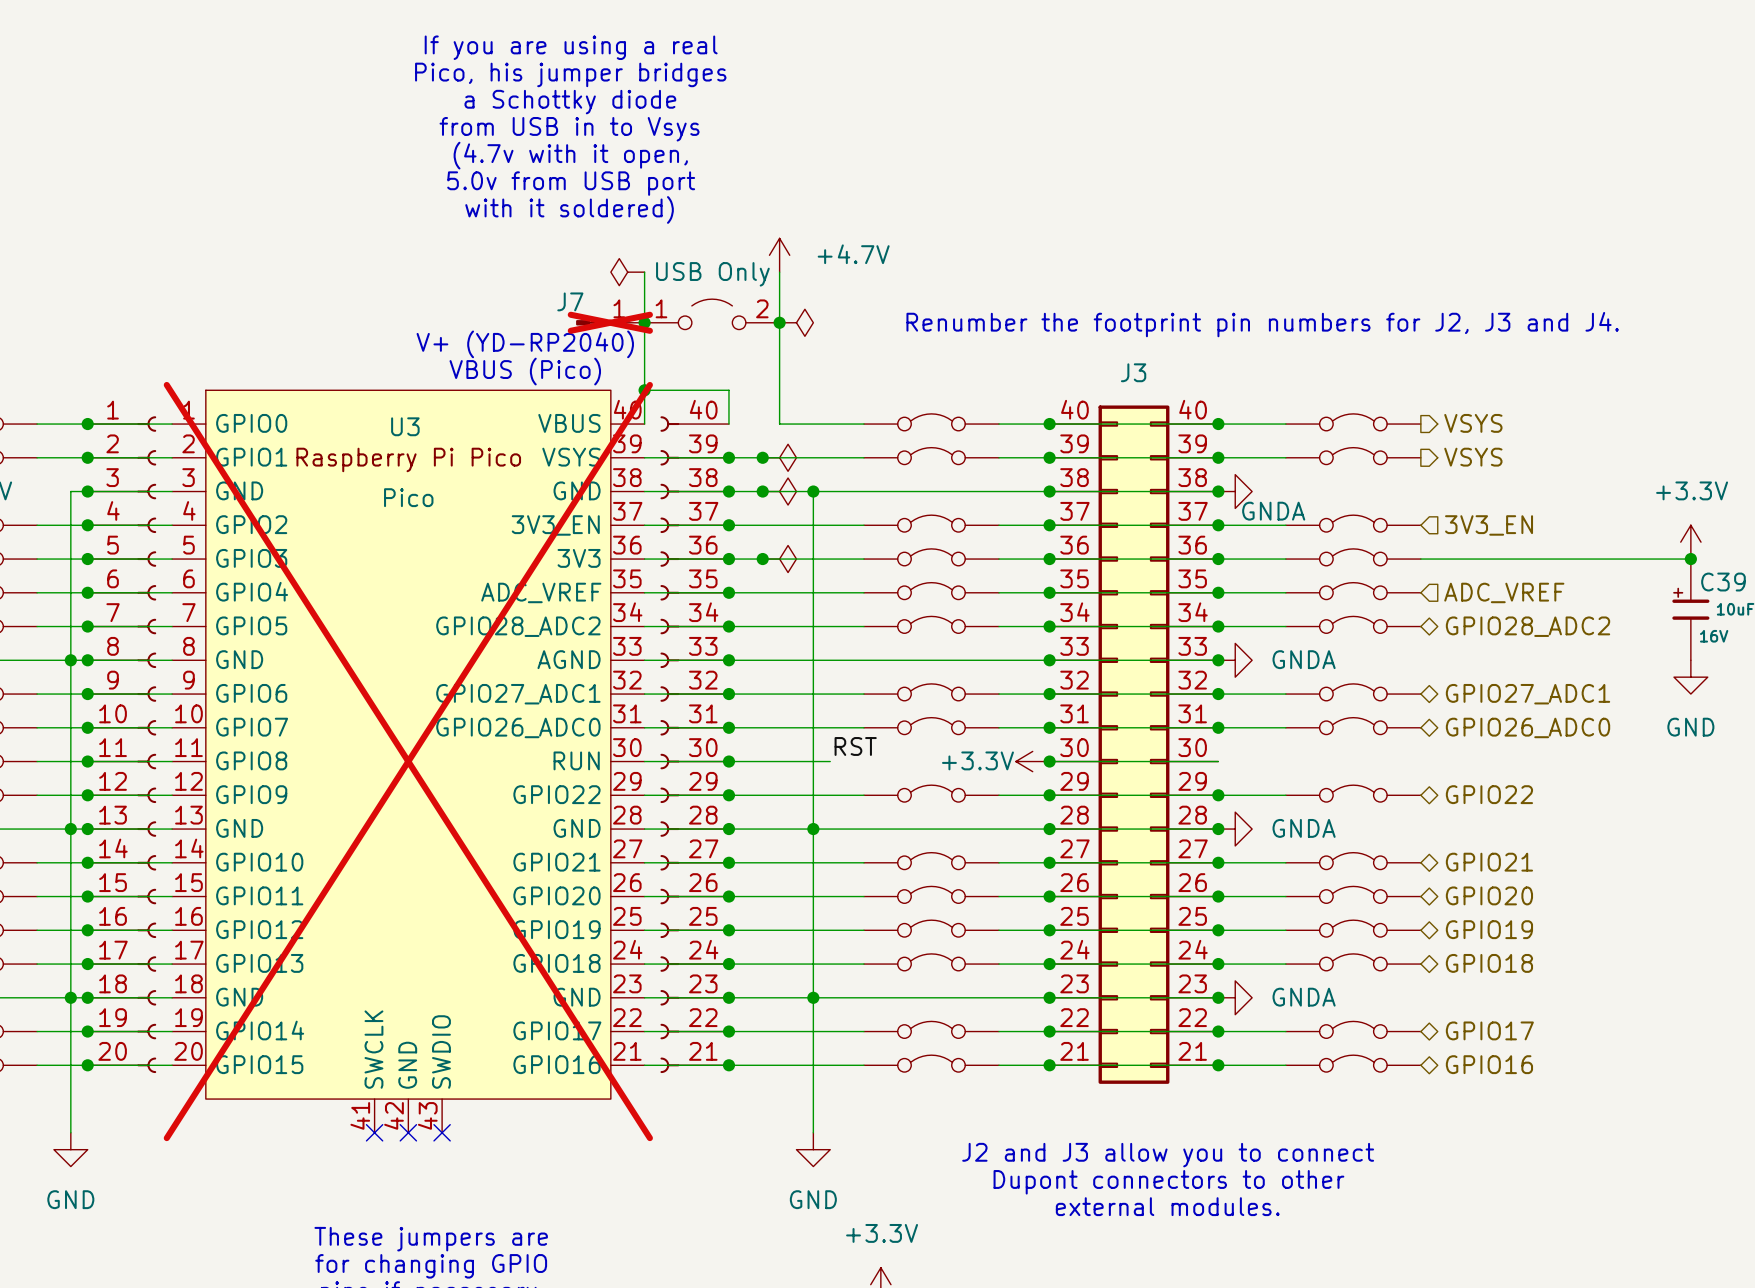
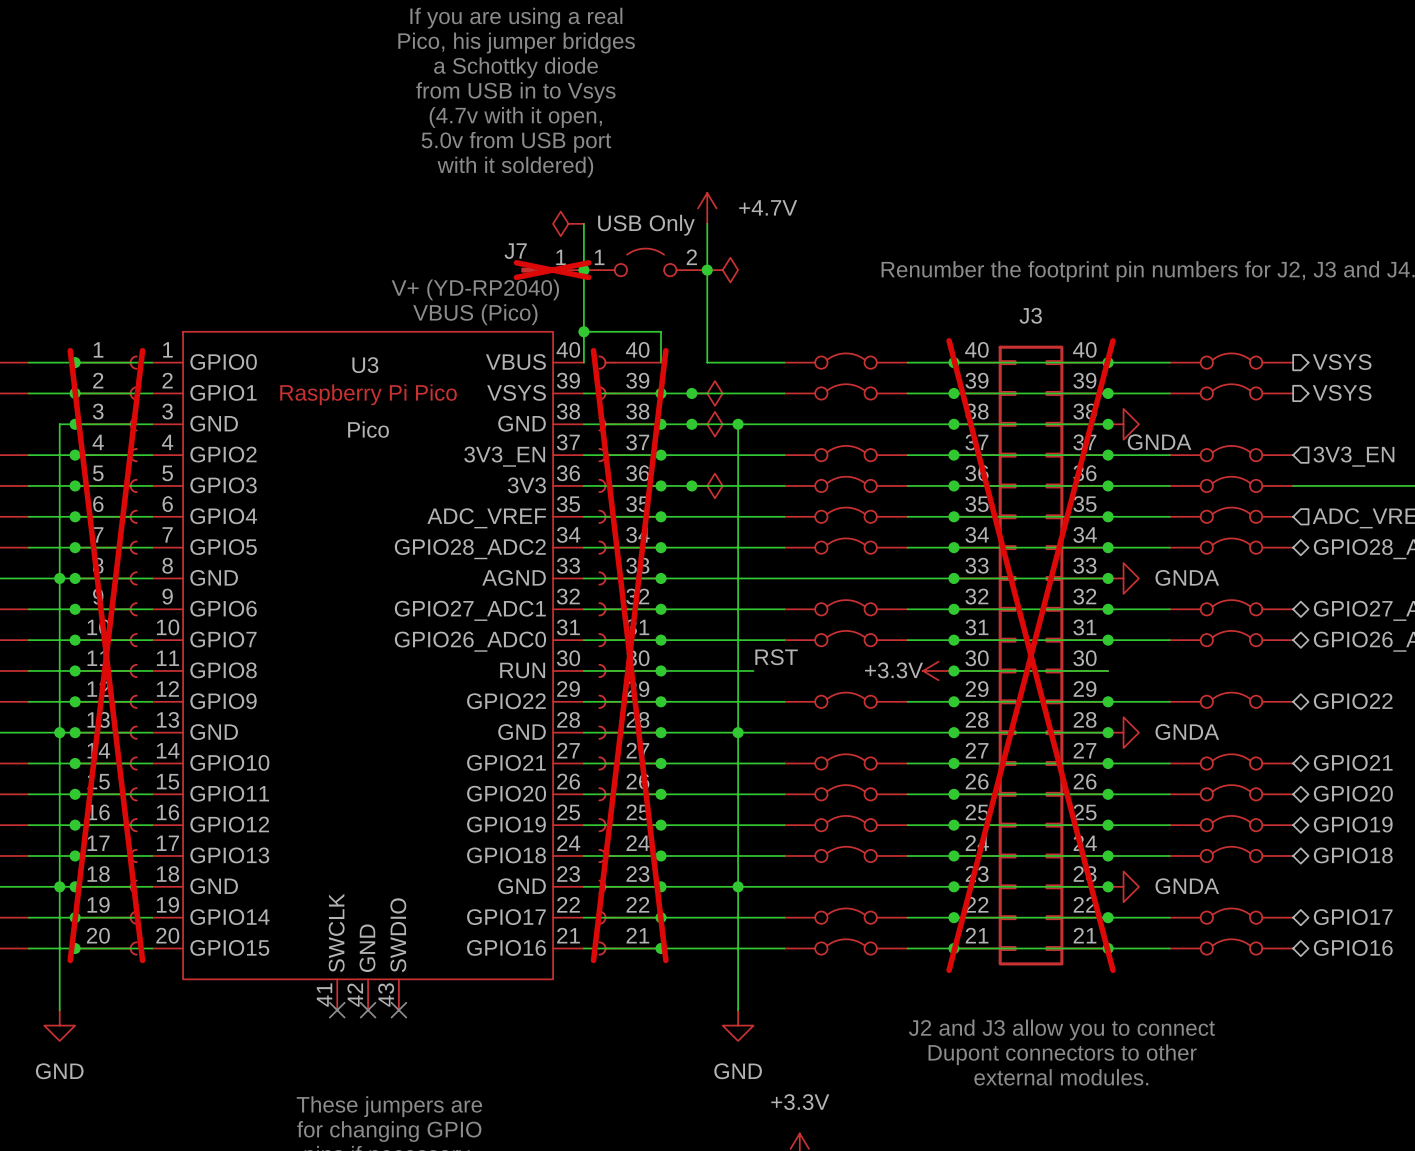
part do-not-place cross: none -> (106, 655)
part do-not-place cross: none -> (629, 655)
J3 do-not-place cross: none -> (1031, 655)
U3 do-not-place cross: (408, 761) -> none

